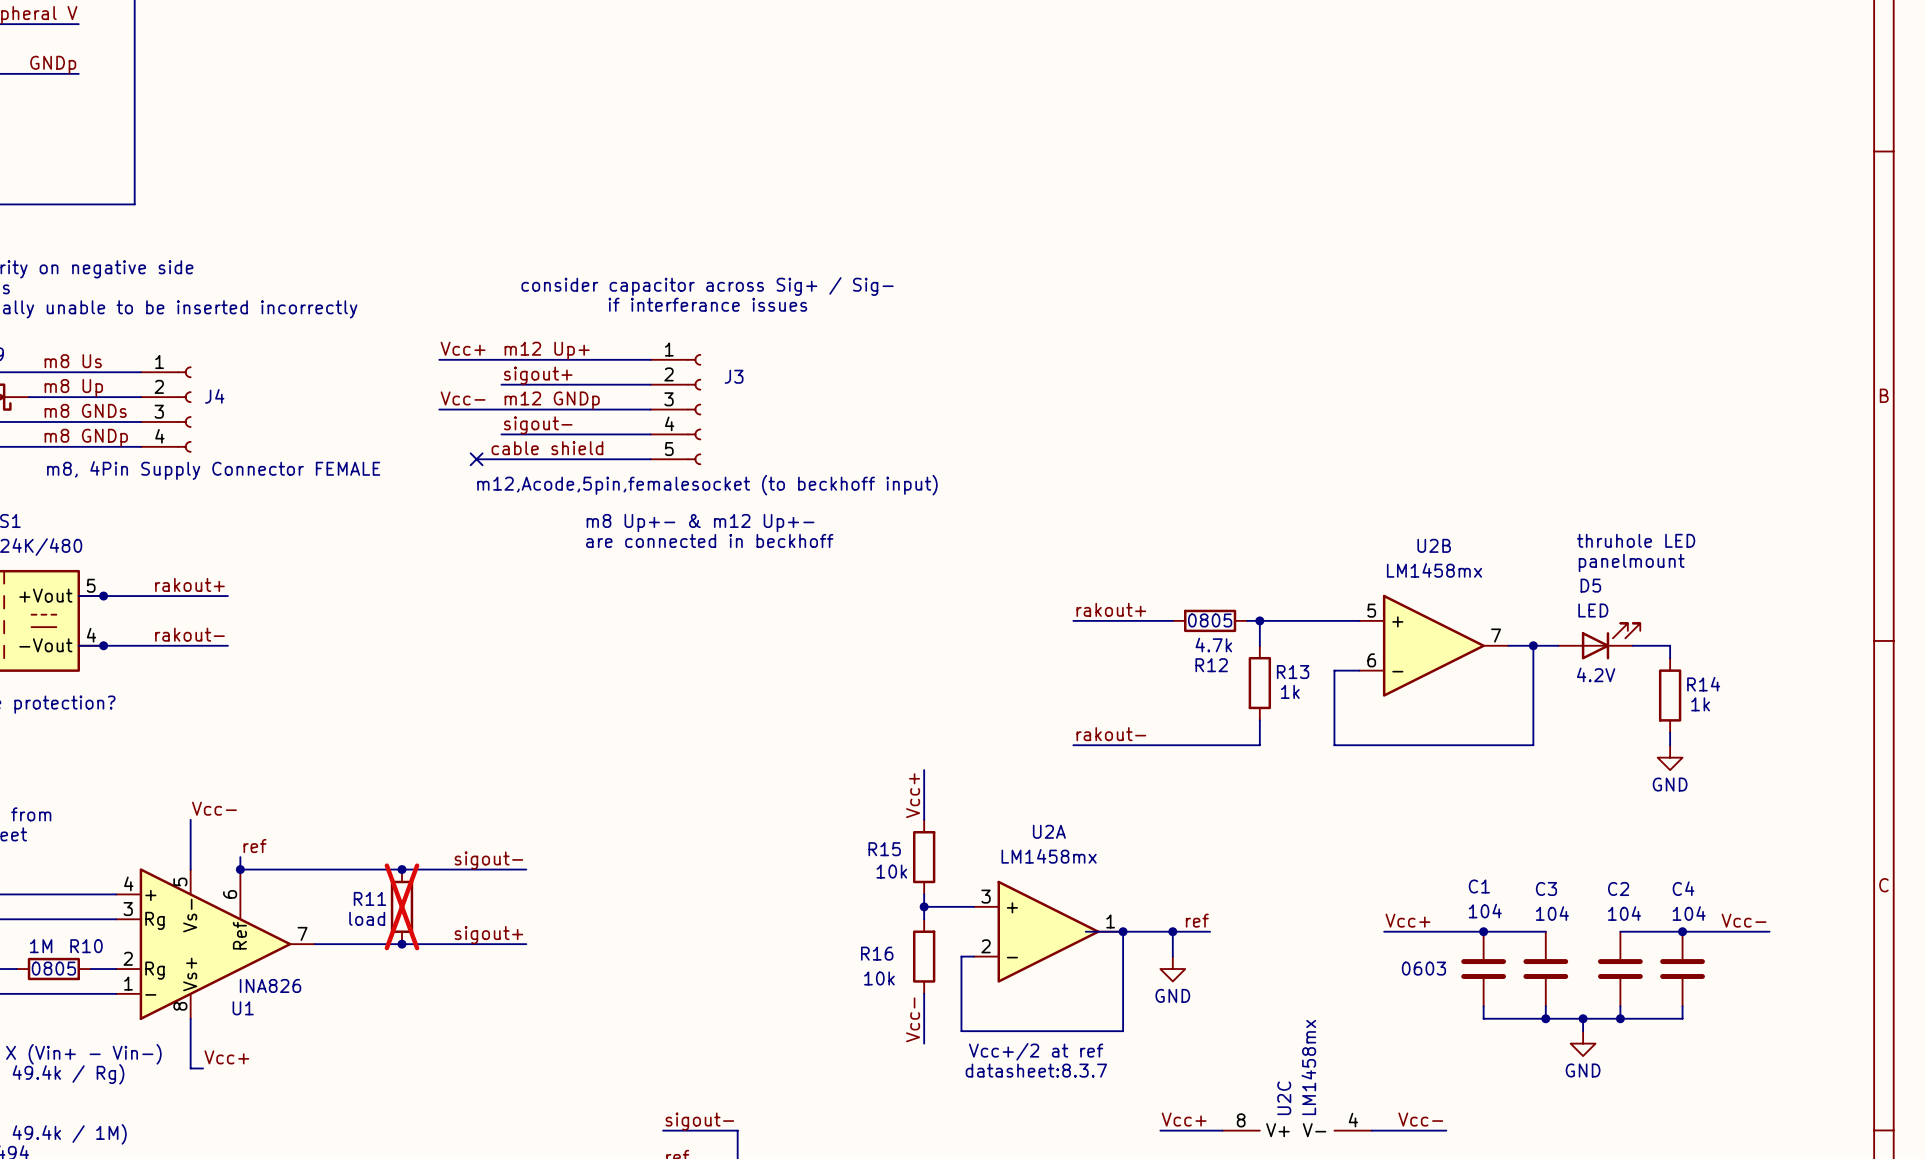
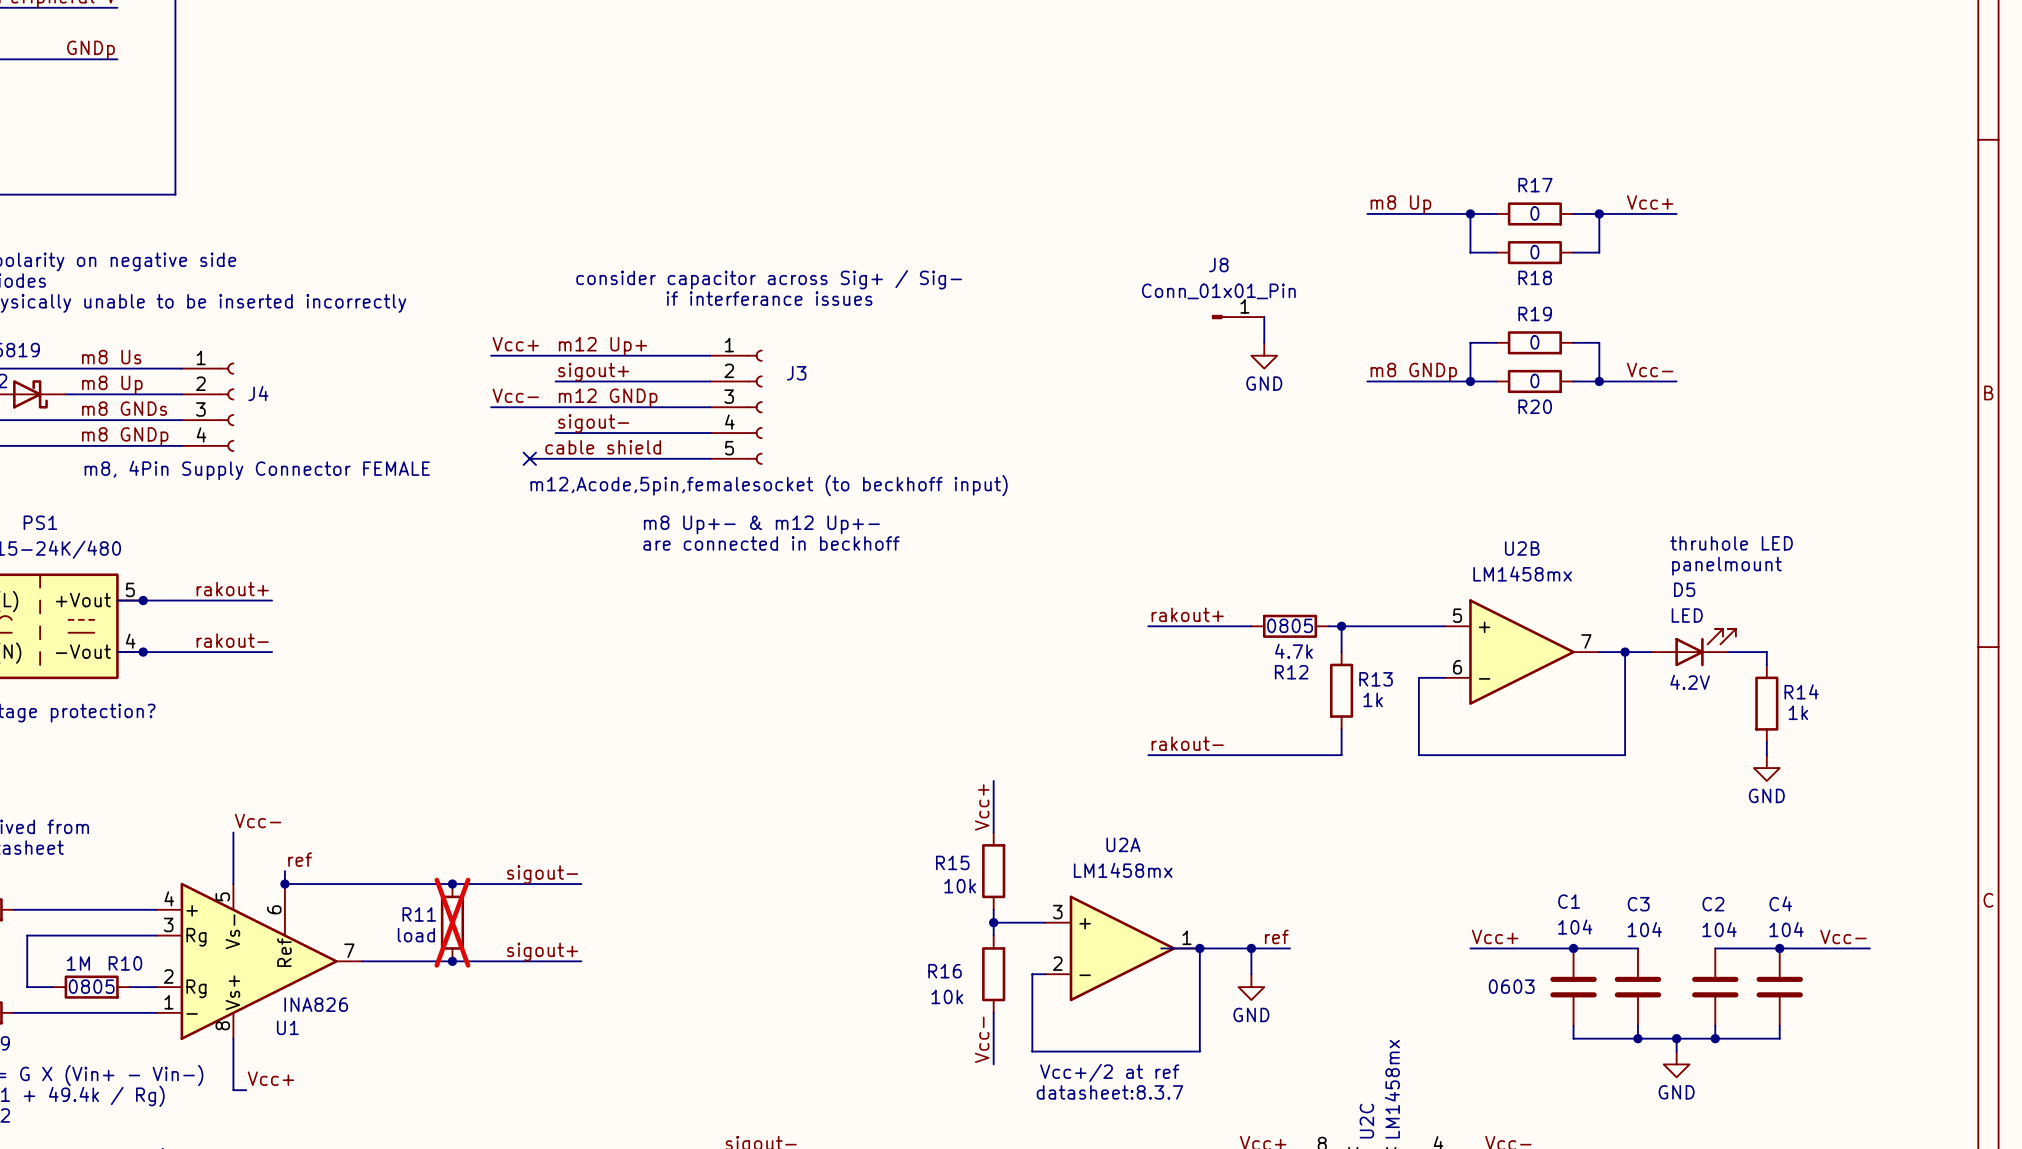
label: none -> Vcc+ (1650, 202)
label: none -> m8 Up (1400, 204)
wire: none -> (1367, 213) (1496, 213)
wire: none -> (1470, 213) (1470, 252) (1496, 252)
junction: none -> (1470, 213)
R17: none -> 0 (1534, 213)
wire: none -> (1573, 213) (1676, 213)
wire: none -> (1599, 213) (1599, 252) (1573, 252)
junction: none -> (1599, 213)
R18: none -> 0 (1534, 252)
J8: none -> Conn_01x01_Pin (1238, 317)
wire: none -> (1264, 317) (1264, 342)
wire: none -> (1496, 342) (1470, 342) (1470, 381)
R19: none -> 0 (1534, 342)
wire: none -> (1573, 342) (1599, 342) (1599, 381)
power symbol: none -> GND (1264, 355)
label: none -> Vcc- (1650, 369)
label: none -> m8 GNDp (1413, 372)
wire: none -> (1367, 381) (1496, 381)
junction: none -> (1470, 381)
R20: none -> 0 (1534, 381)
wire: none -> (1573, 381) (1676, 381)
junction: none -> (1599, 381)

